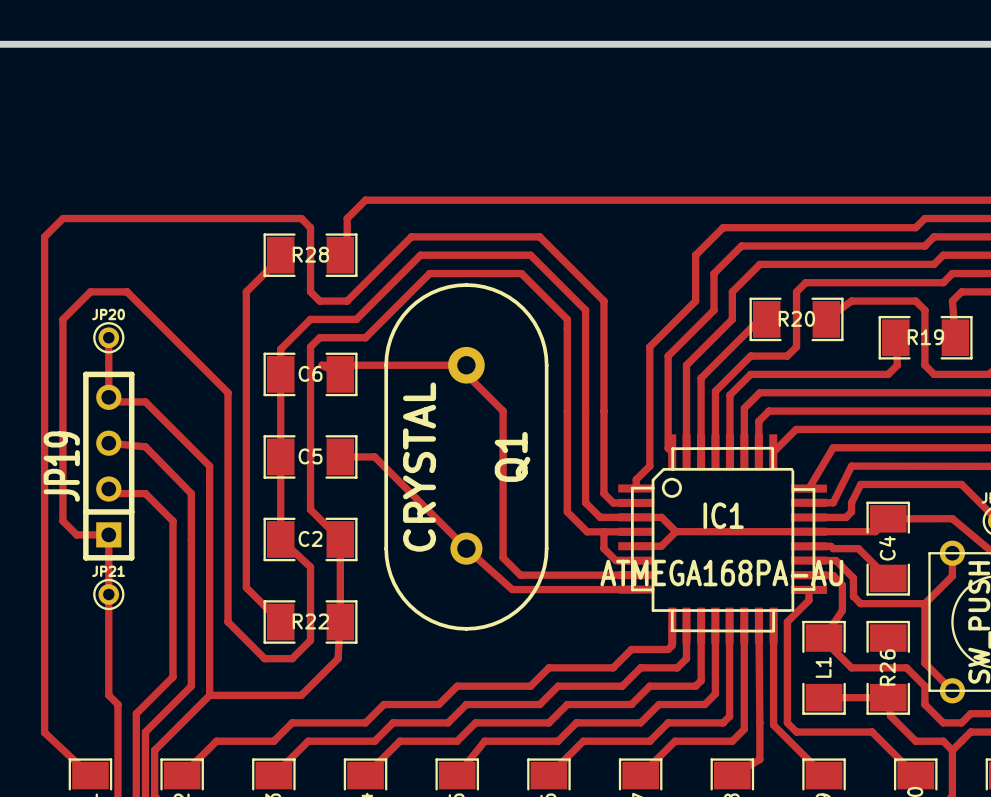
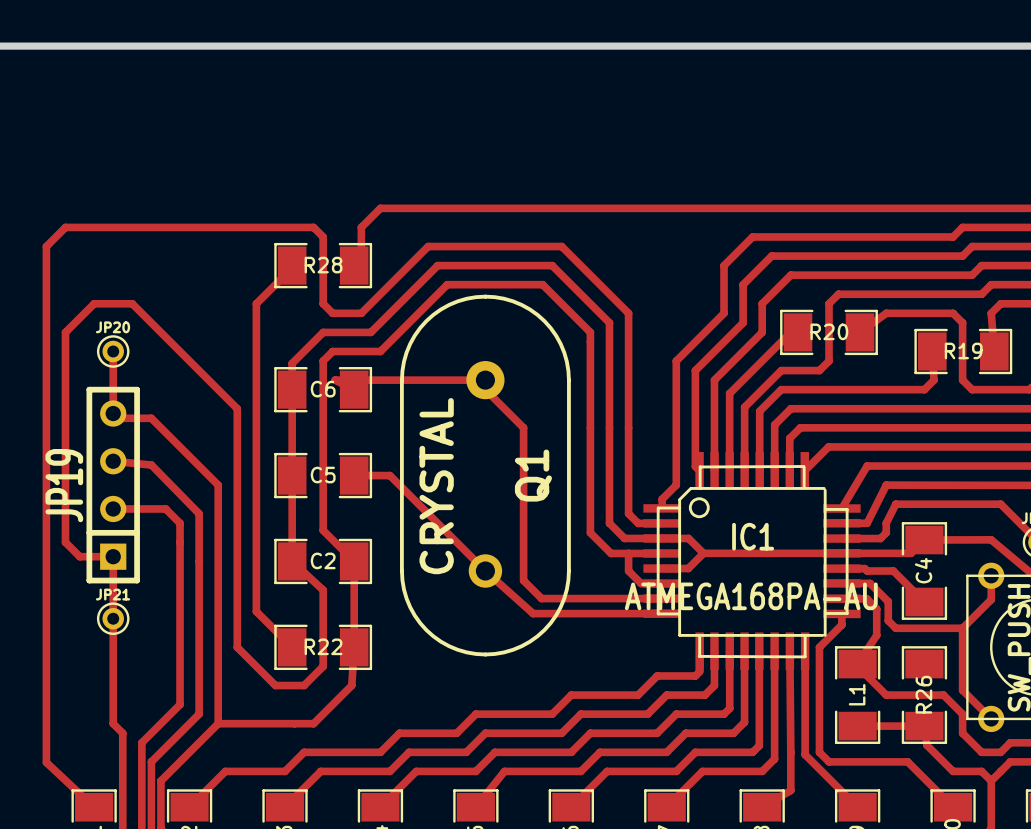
top track: (113, 493) (145, 493) (172, 521) -> (113, 508) (165, 508) (180, 523) (180, 542)

